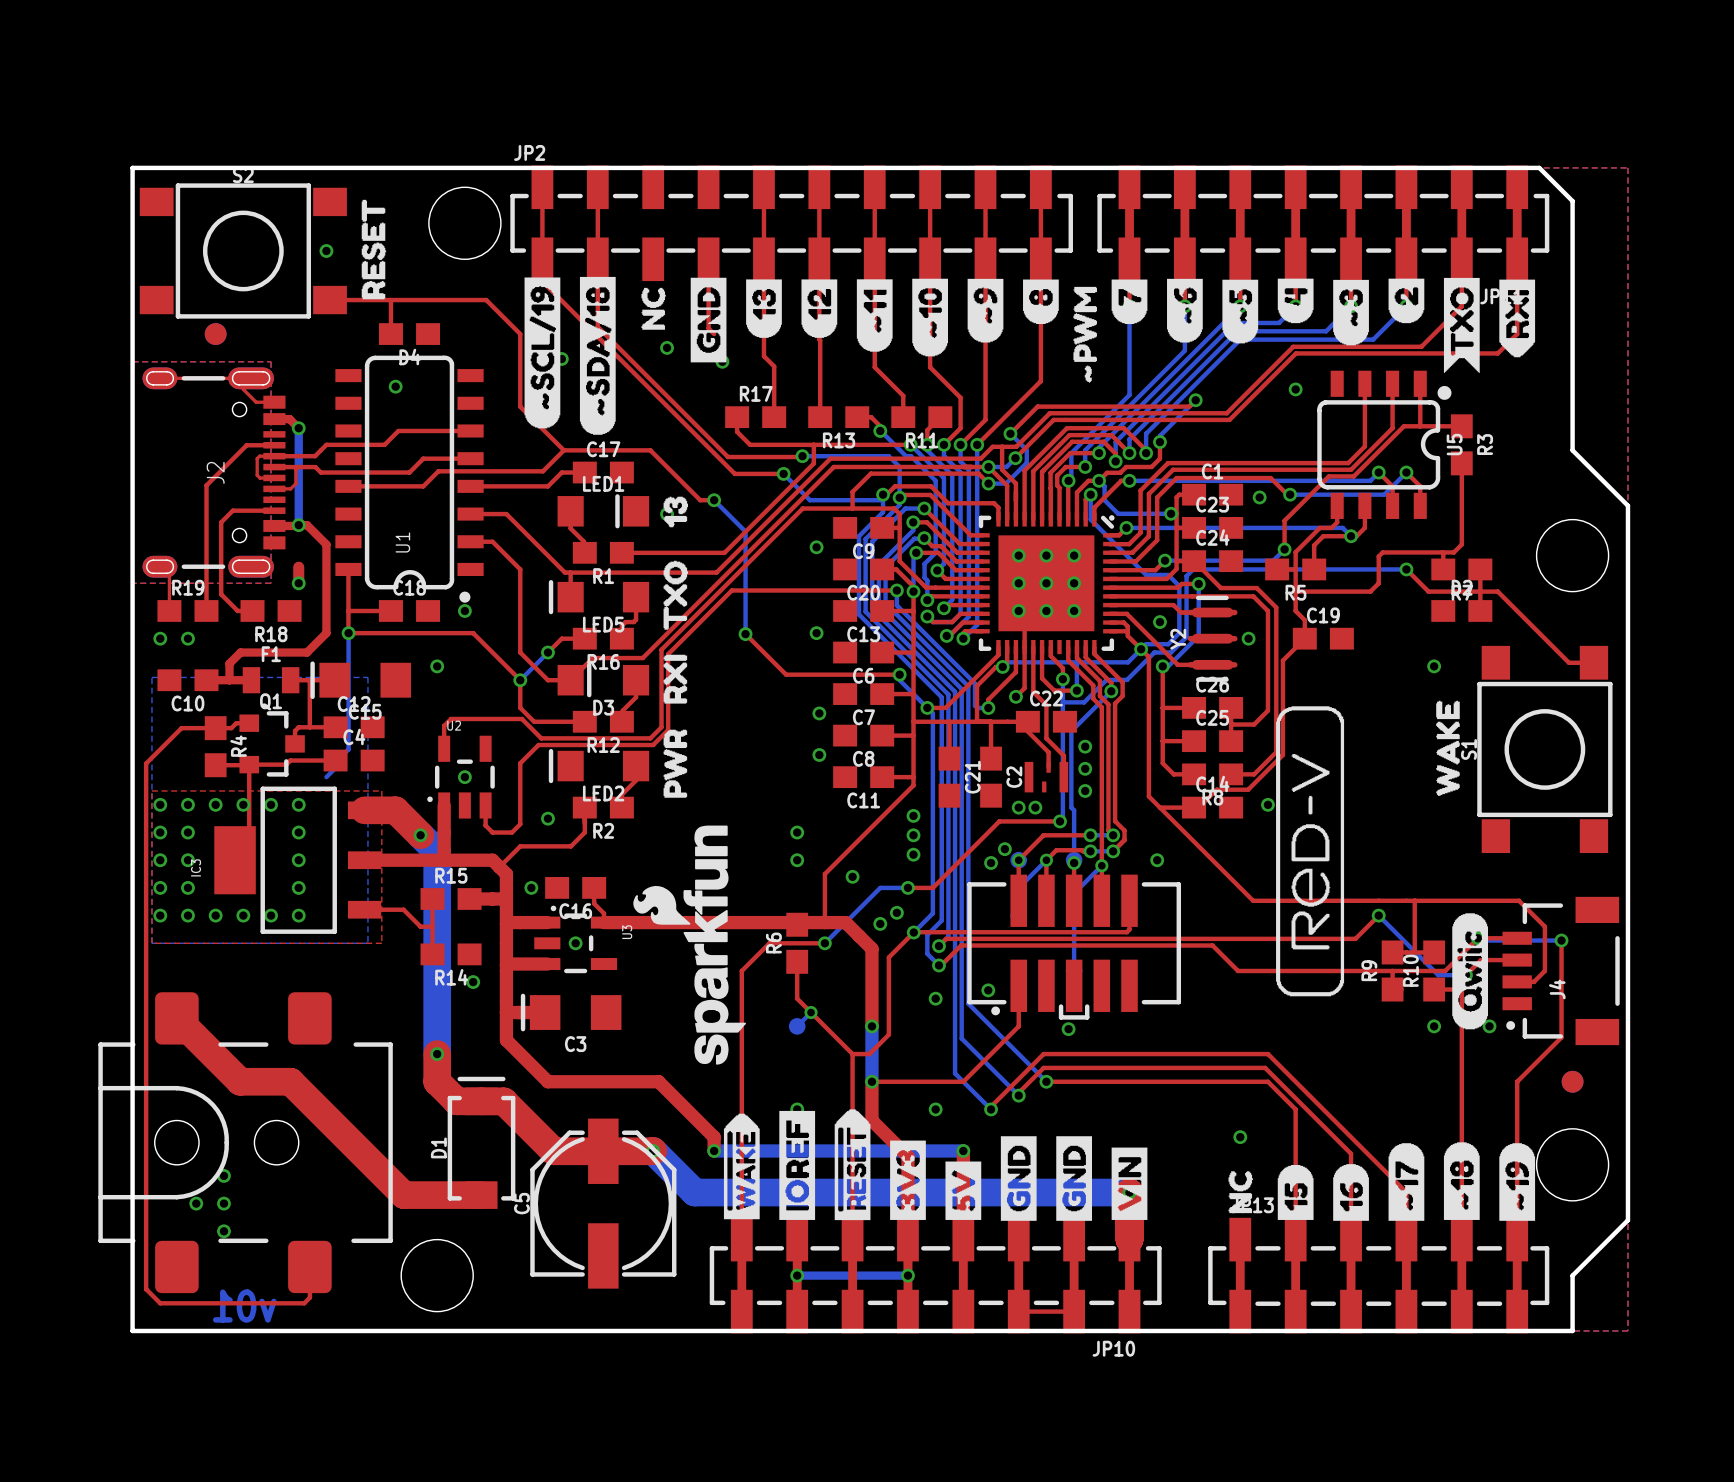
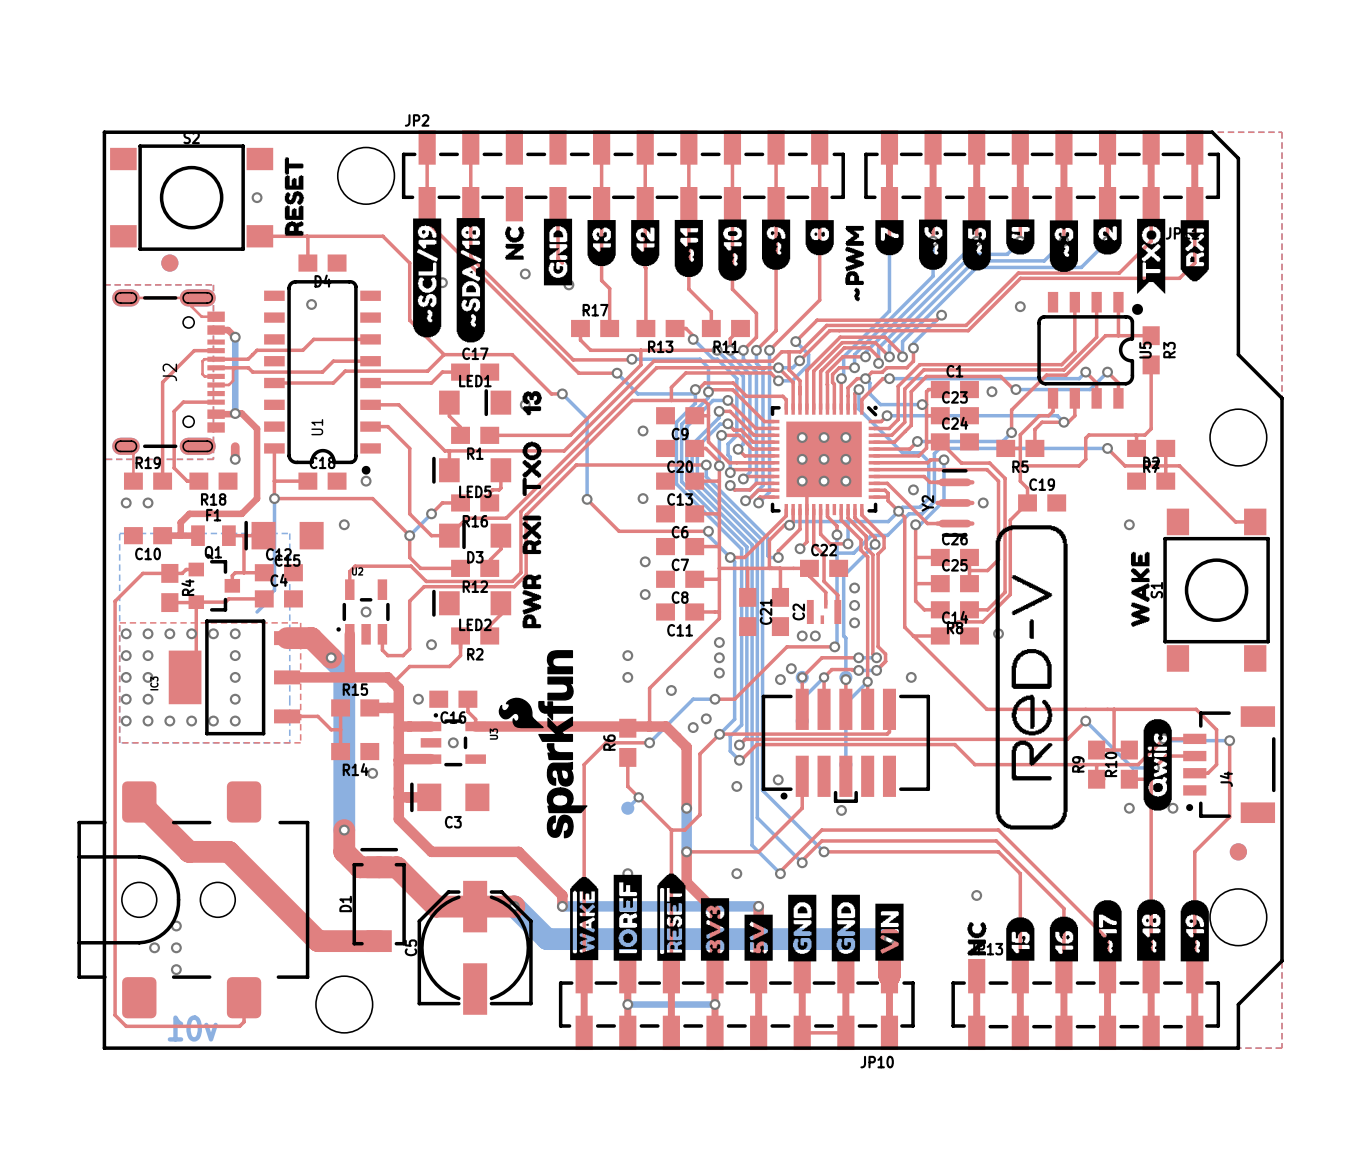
drawing shape: [1276, 706, 1345, 997] -> [995, 525, 1068, 830]

